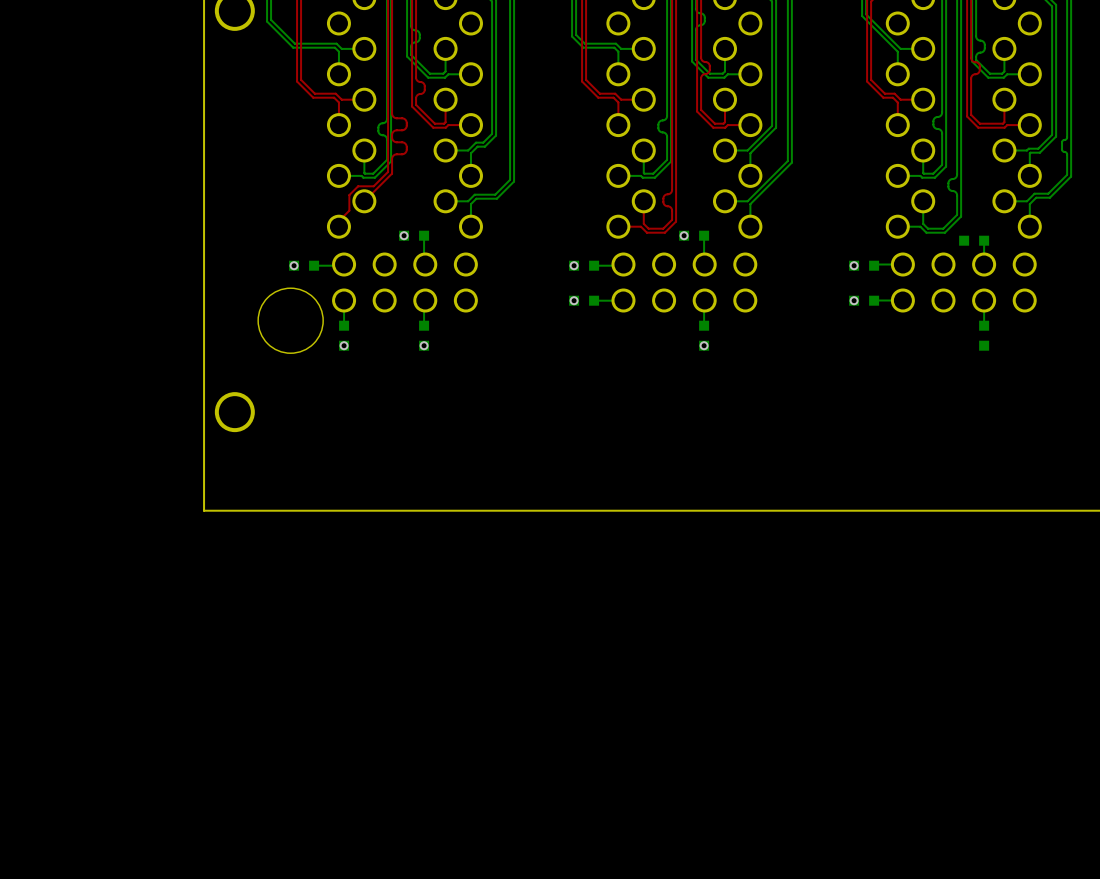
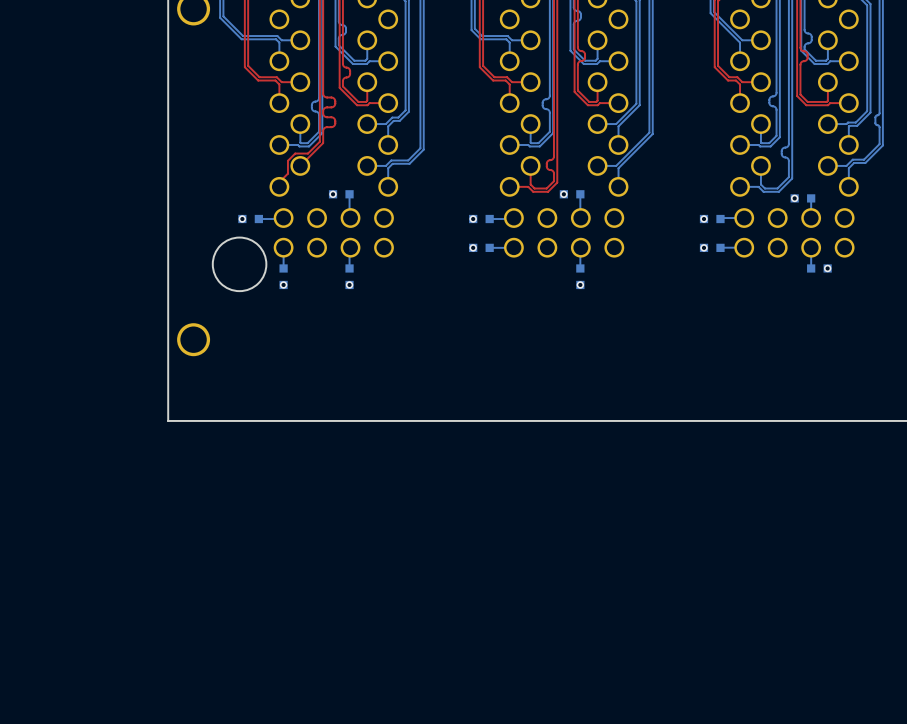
via: none -> (794, 198)
via: none -> (827, 268)
part rotation: 0° (984, 335) -> 90° clockwise (819, 268)

